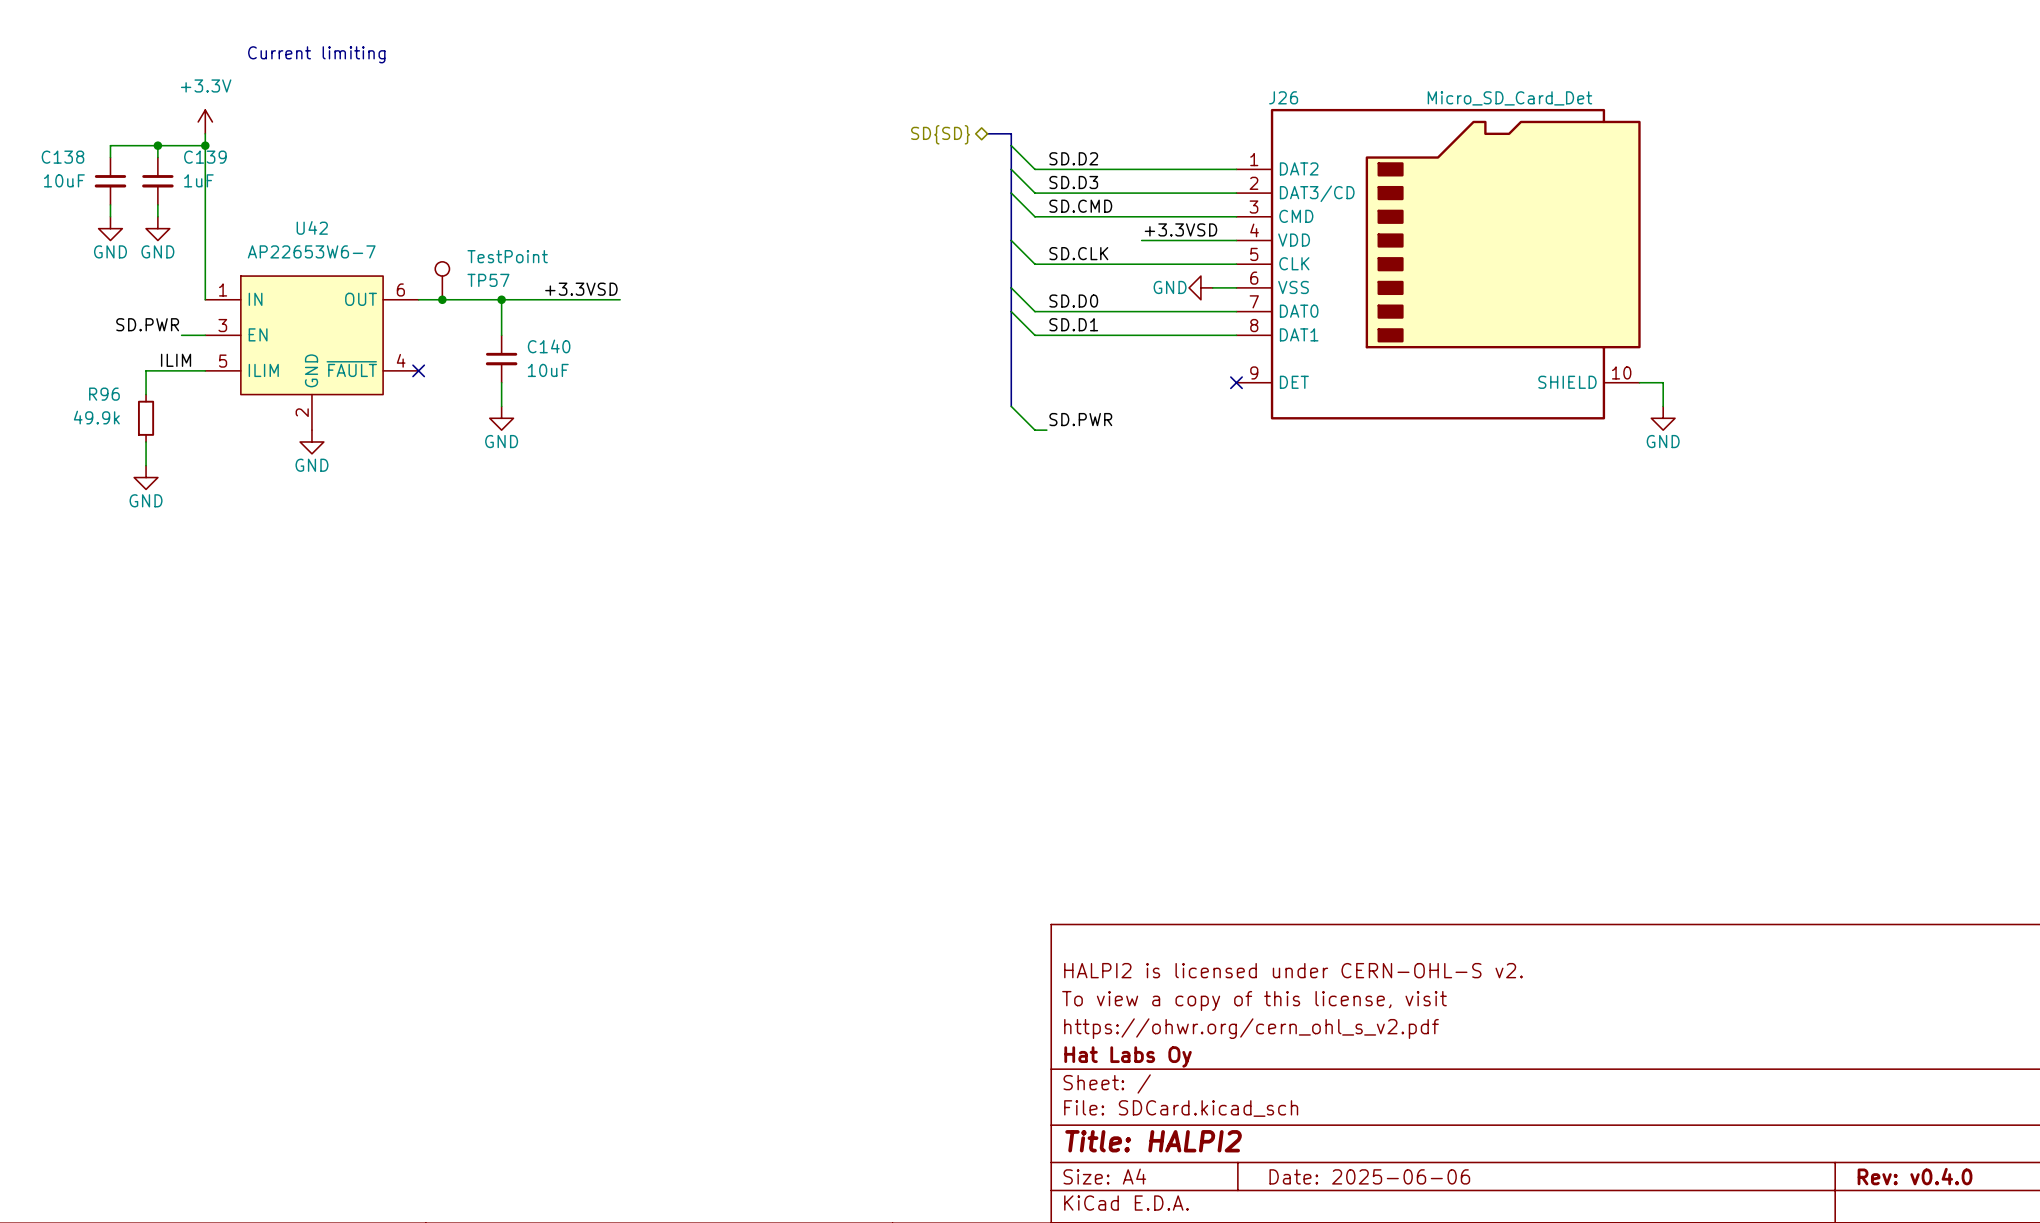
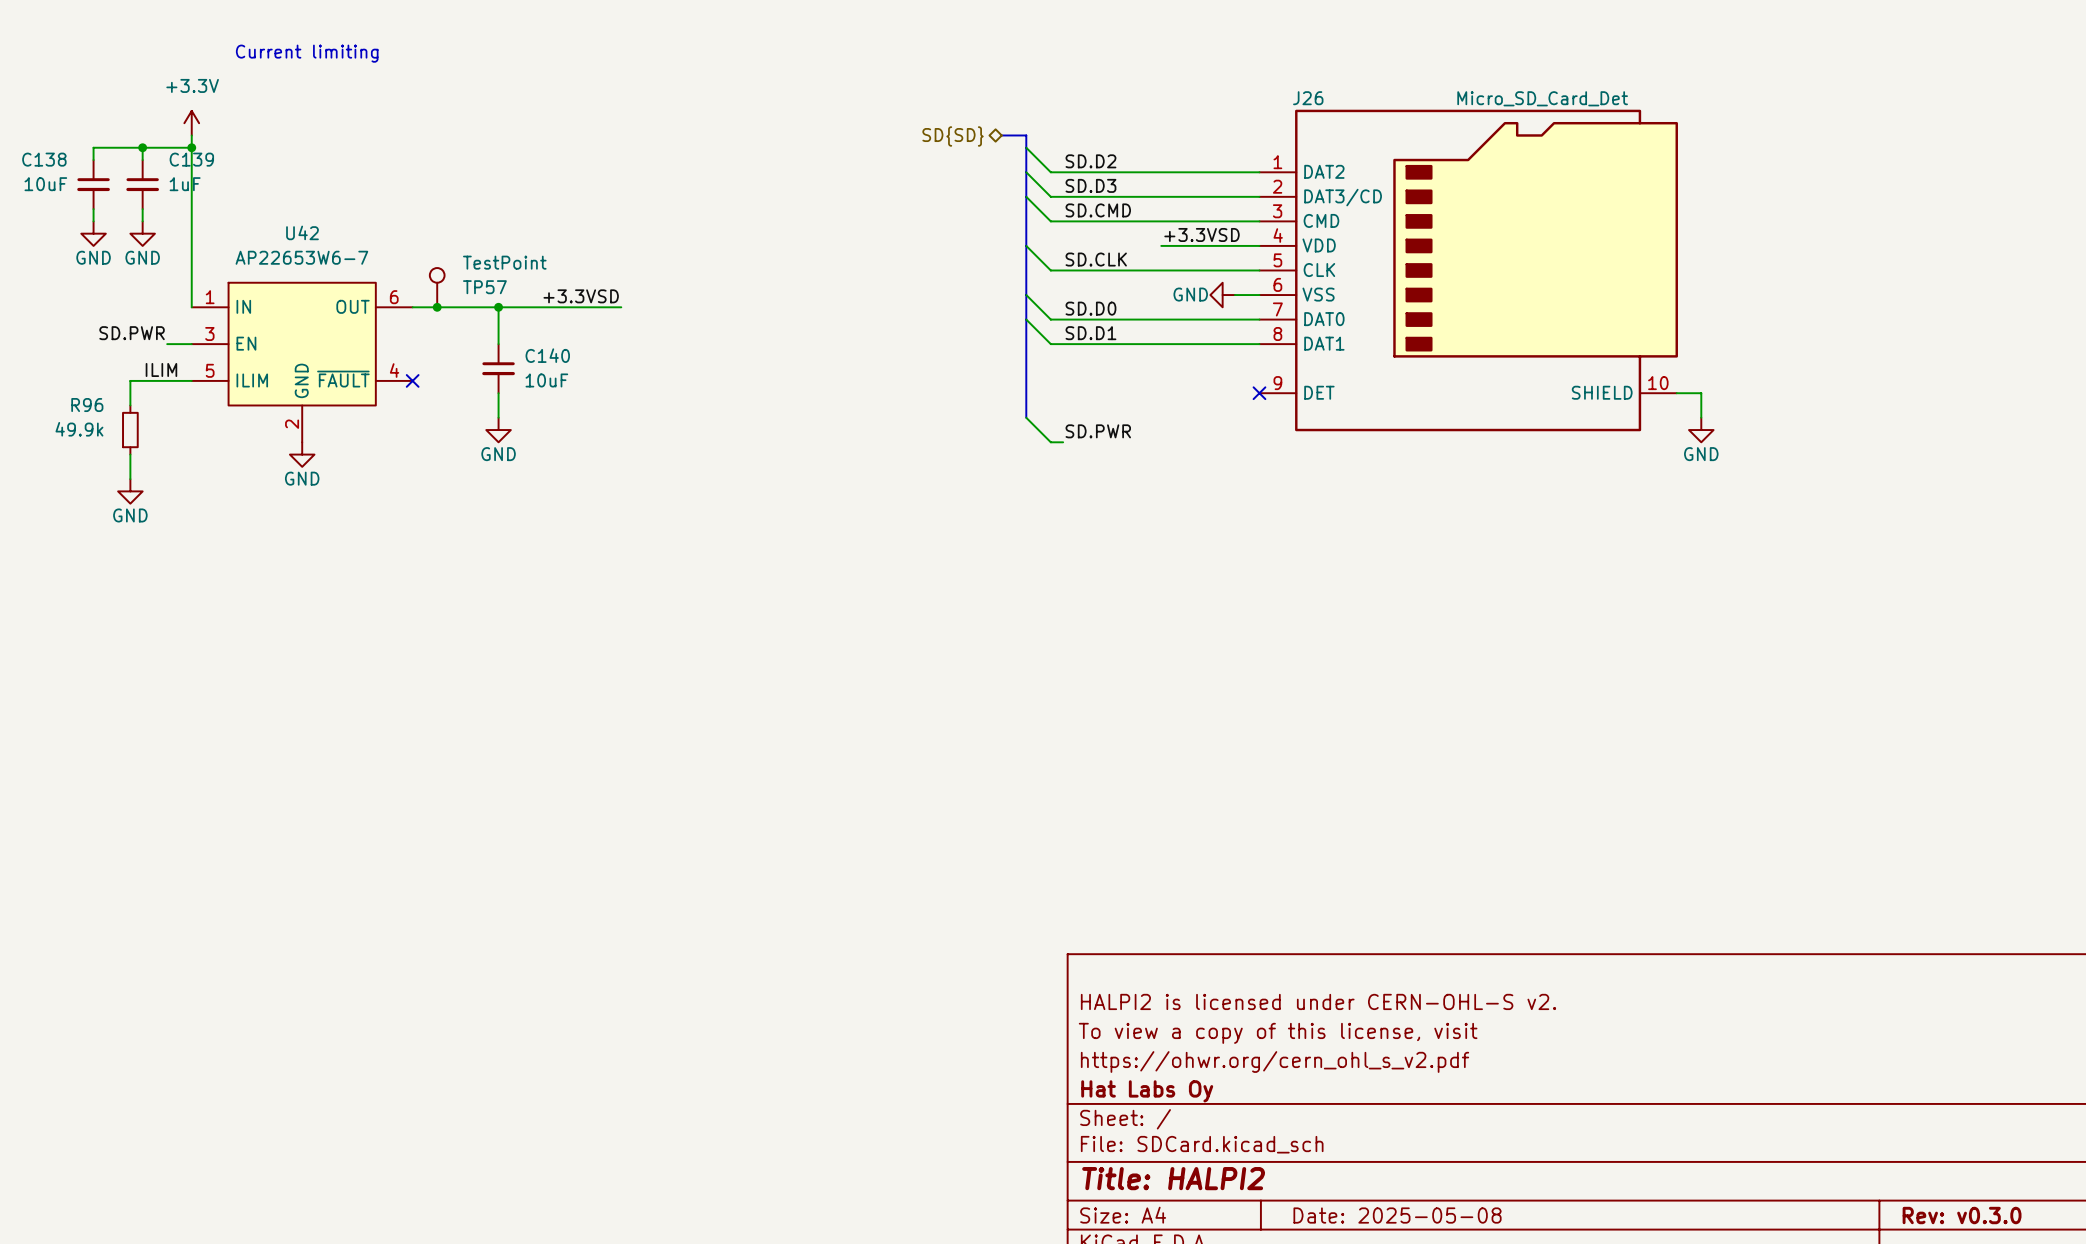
title block: Date: 2025-06-06 (1369, 1176) -> Date: 2025-05-08 (1397, 1215)
title block: Rev: v0.4.0 (1915, 1176) -> Rev: v0.3.0 (1962, 1215)

